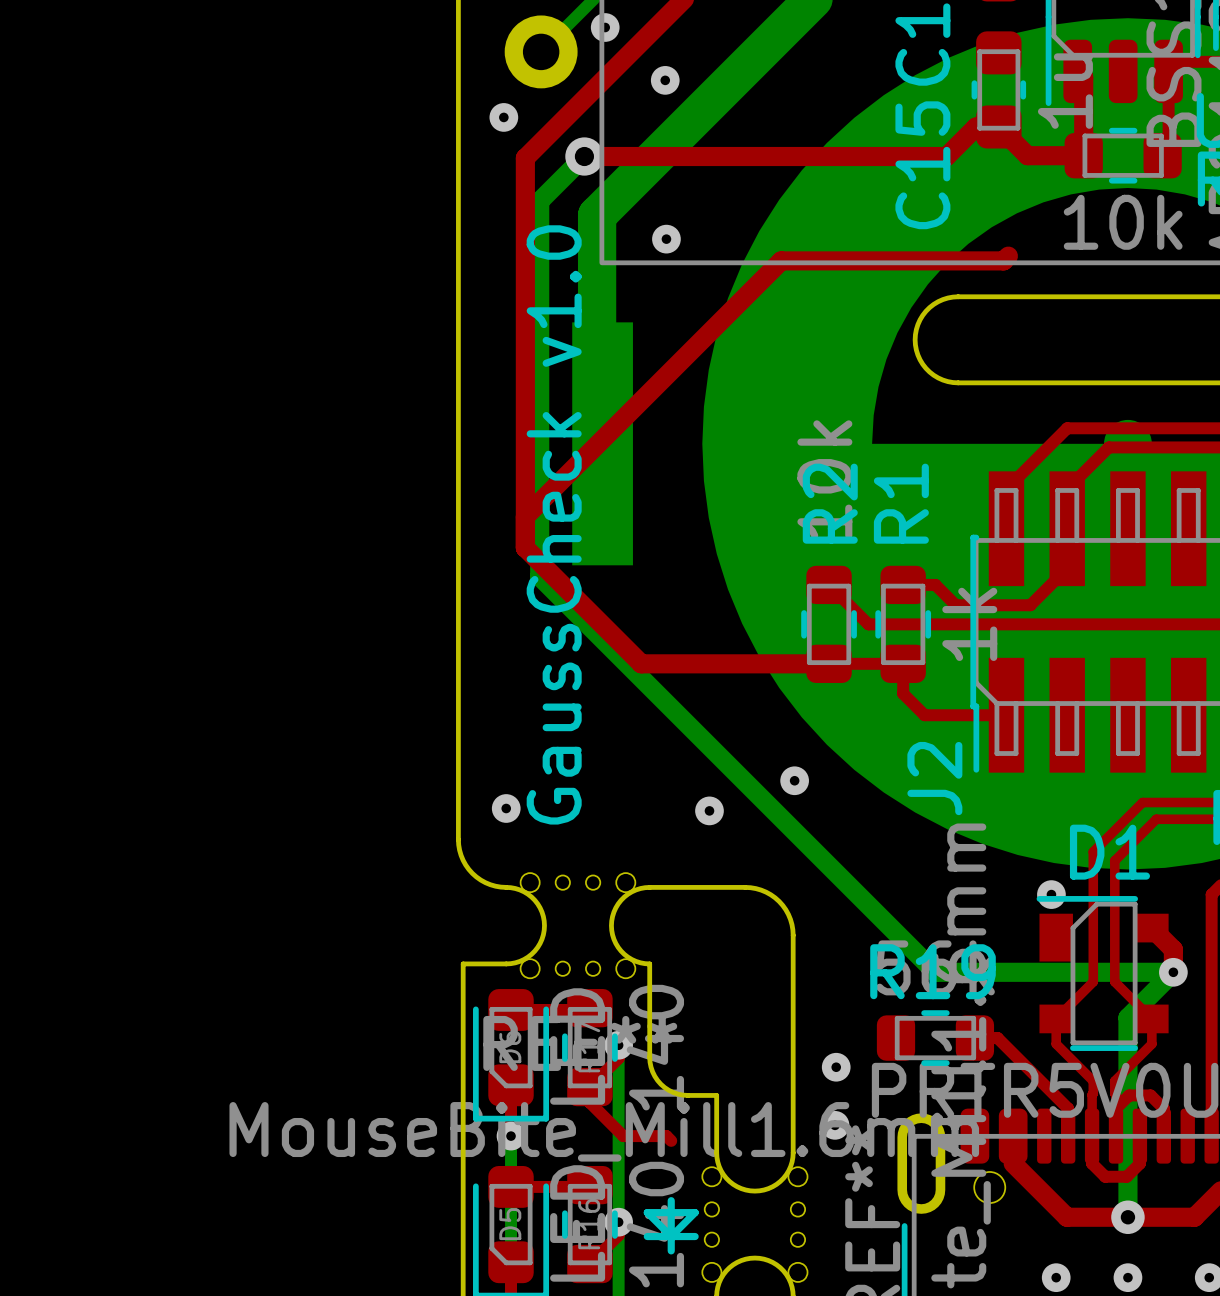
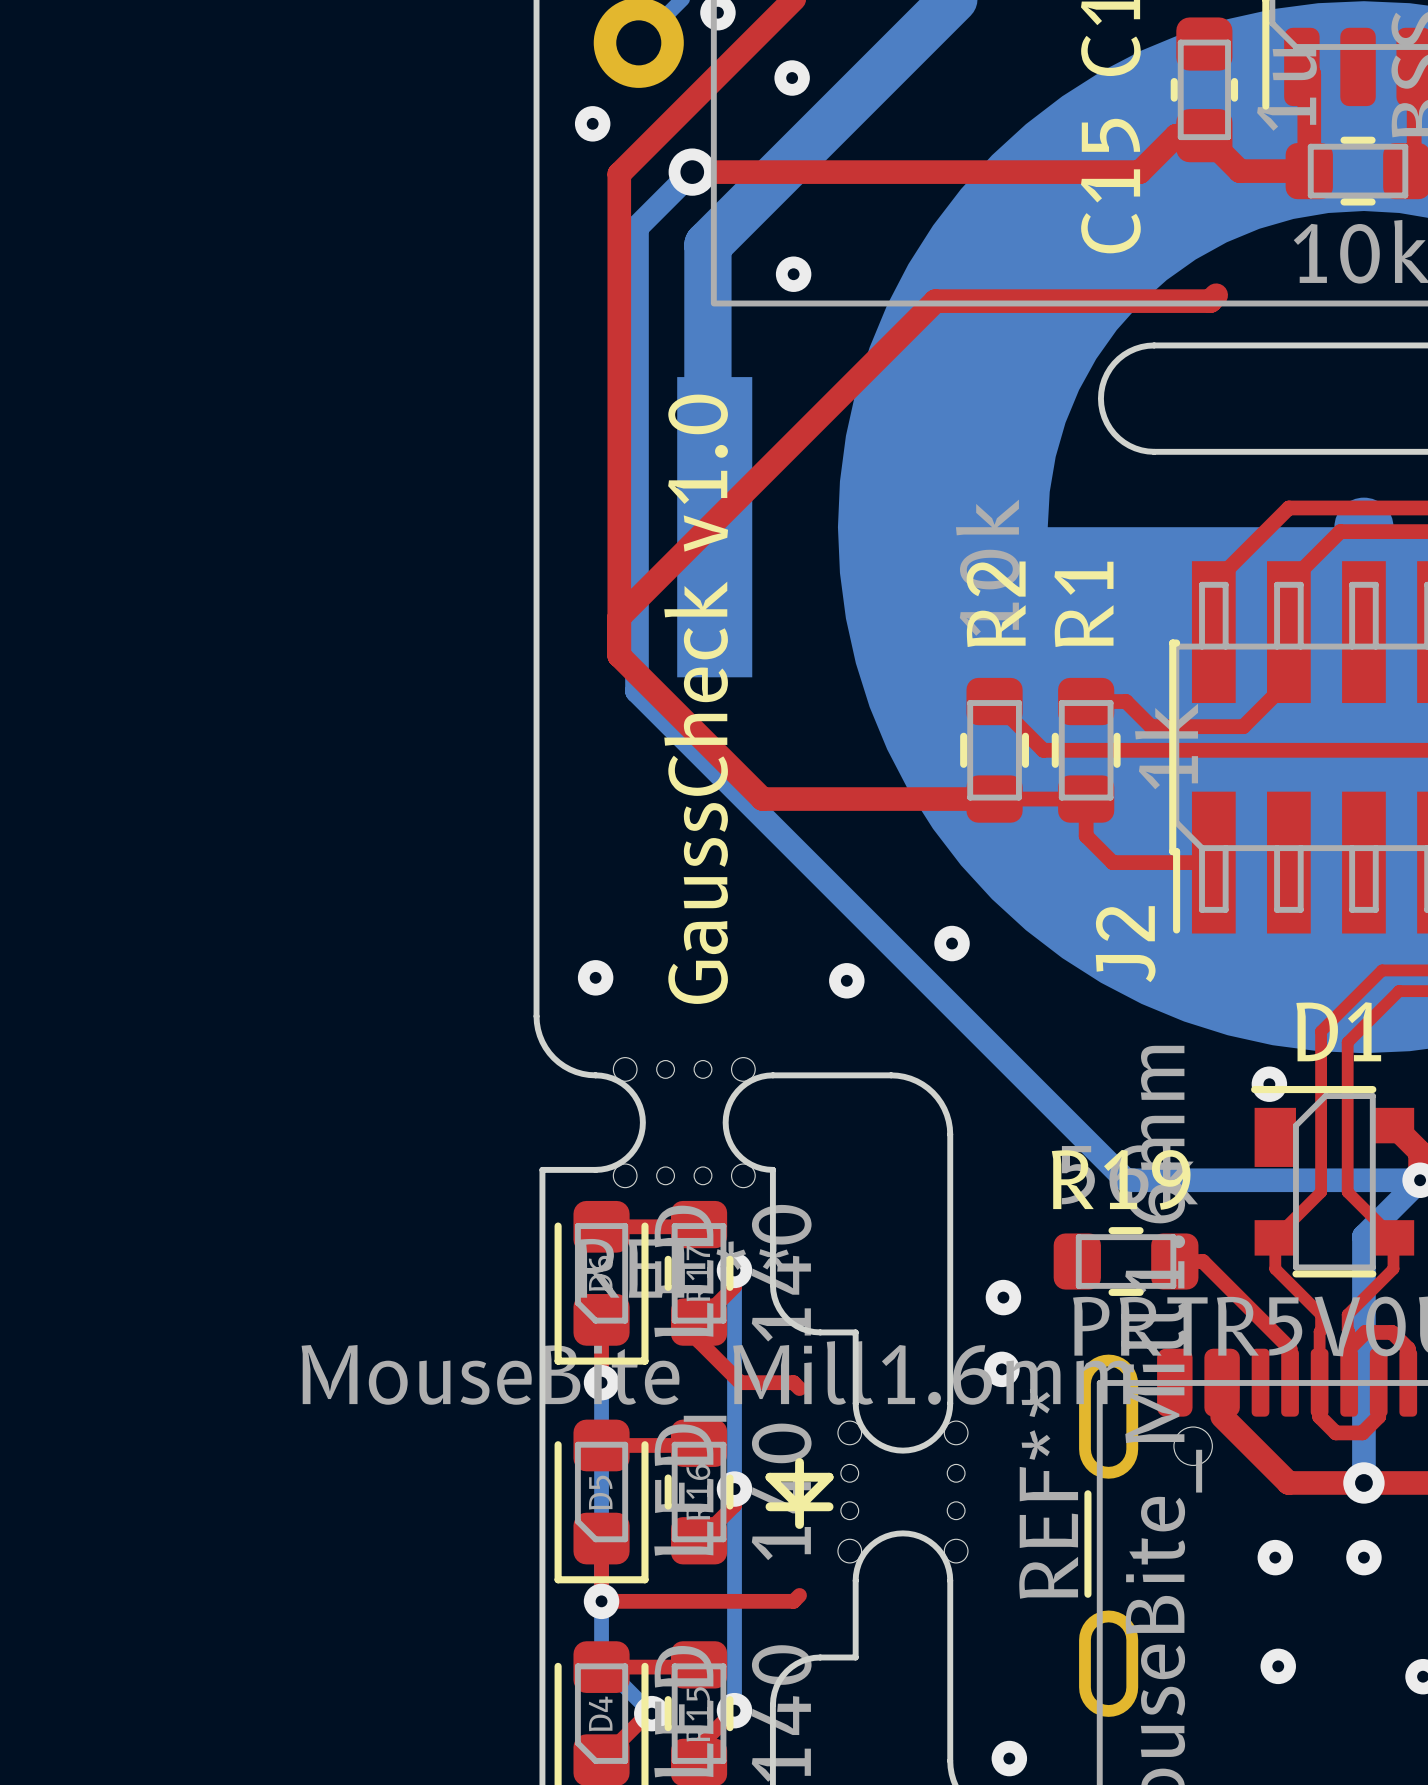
text position: GaussCheck v1.0 (554, 524) -> GaussCheck v1.0 (696, 699)

